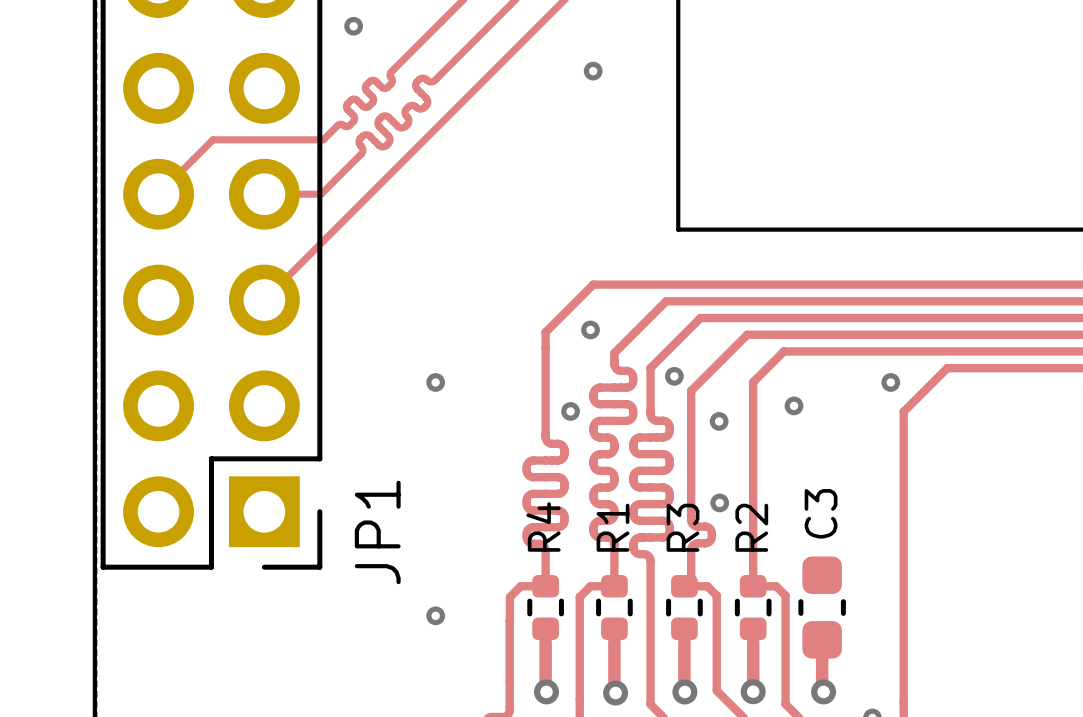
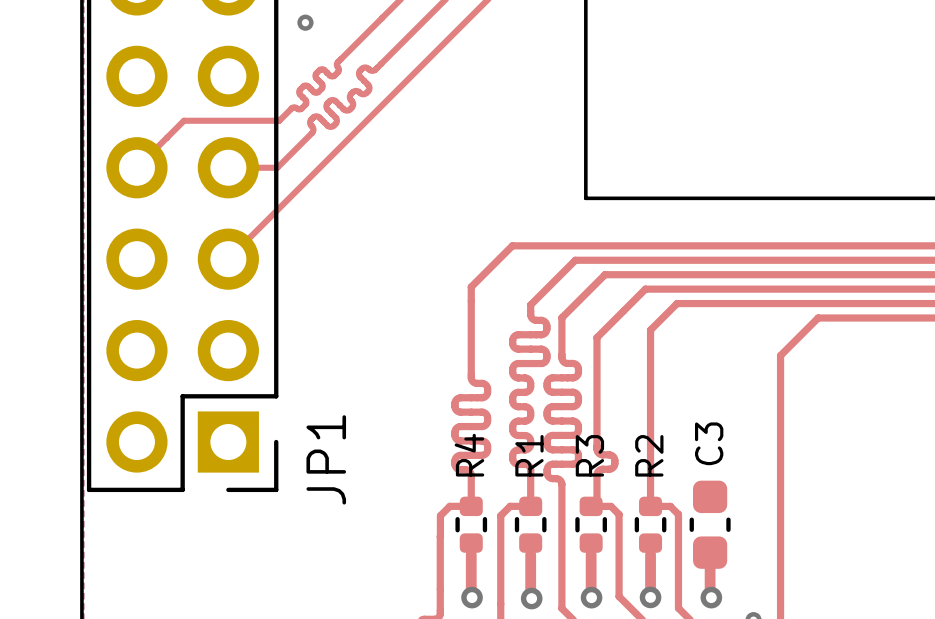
via: (593, 71) -> none
via: (590, 329) -> none
via: (674, 376) -> none
via: (435, 382) -> none
via: (890, 382) -> none
via: (794, 405) -> none
via: (570, 411) -> none
via: (719, 421) -> none
via: (719, 502) -> none
via: (435, 615) -> none

